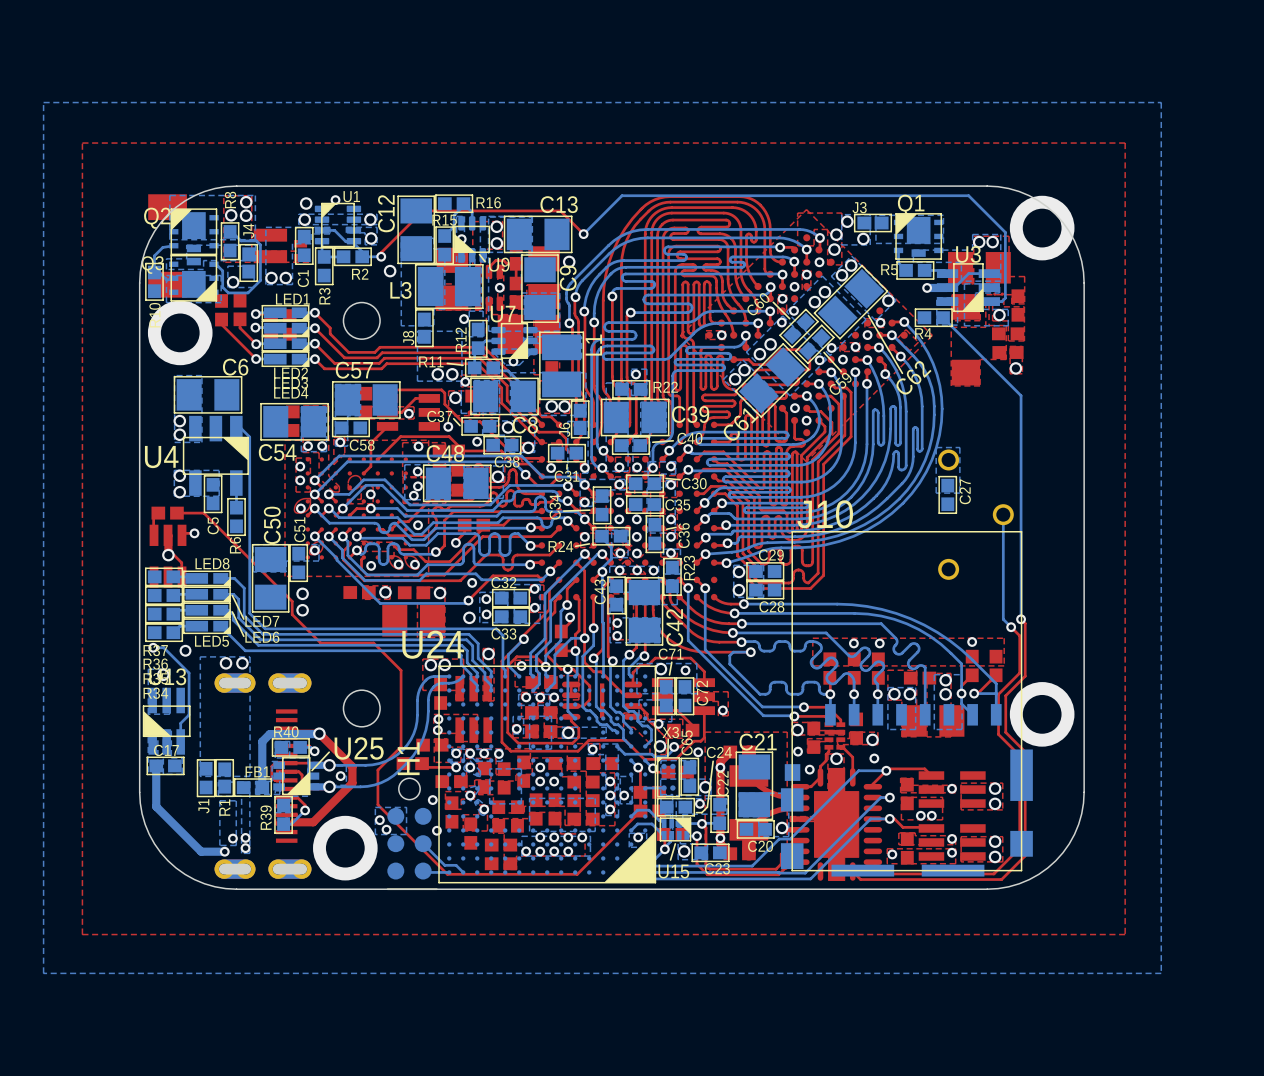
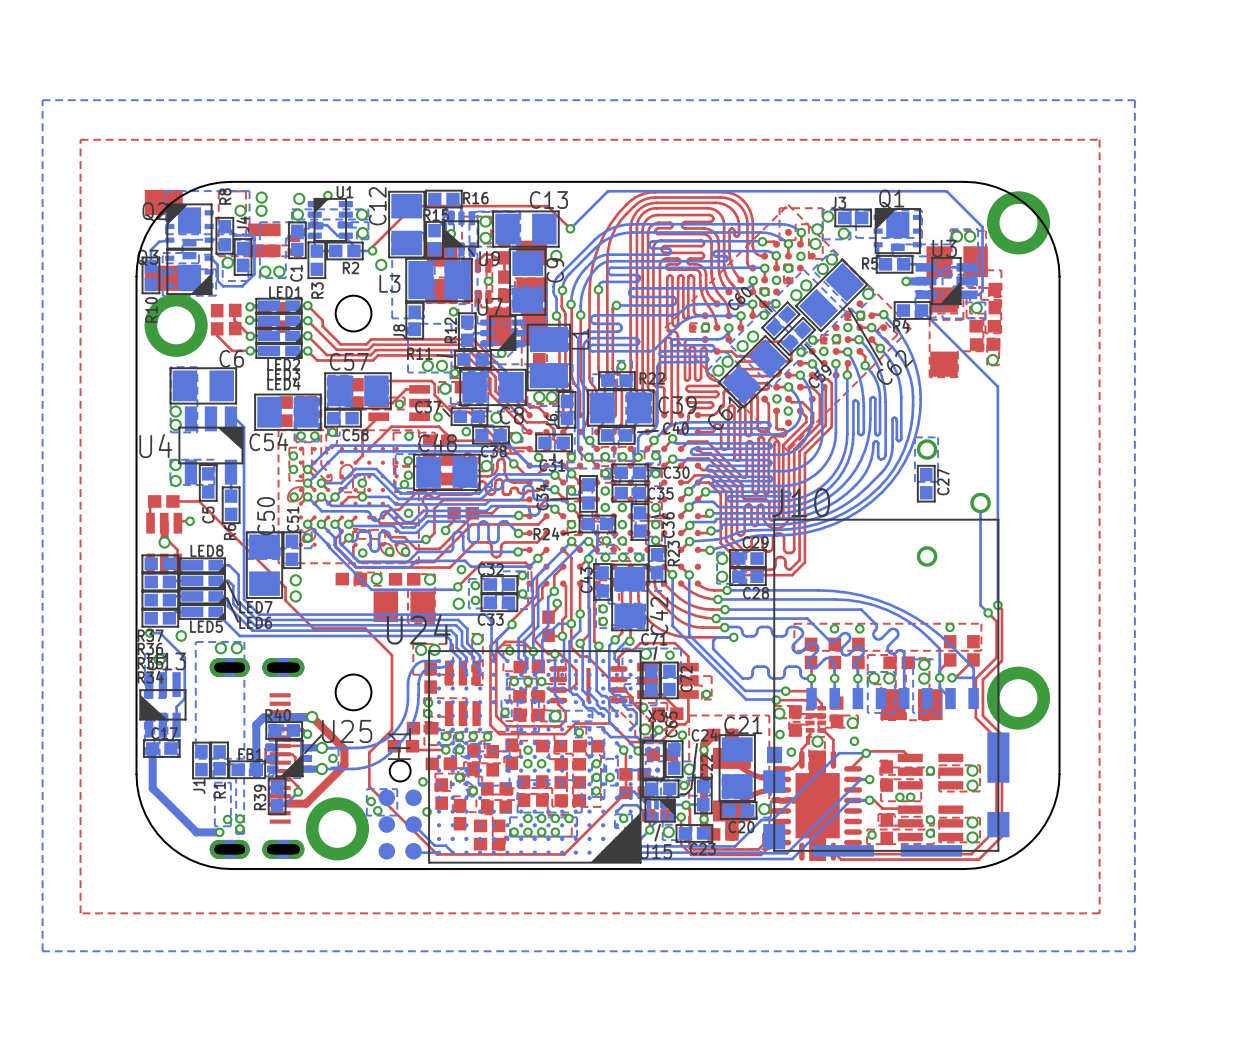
via: (246, 202) -> none
via: none -> (261, 197)
via: (231, 215) -> none
via: none -> (261, 210)
via position: (233, 282) -> (227, 262)
part: (240, 309) -> none
part: (221, 310) -> none
top track: (221, 319) (221, 324) (256, 359) -> (217, 328) (217, 335) (232, 350) (250, 350)
part: none -> (235, 319)
part: none -> (217, 319)

